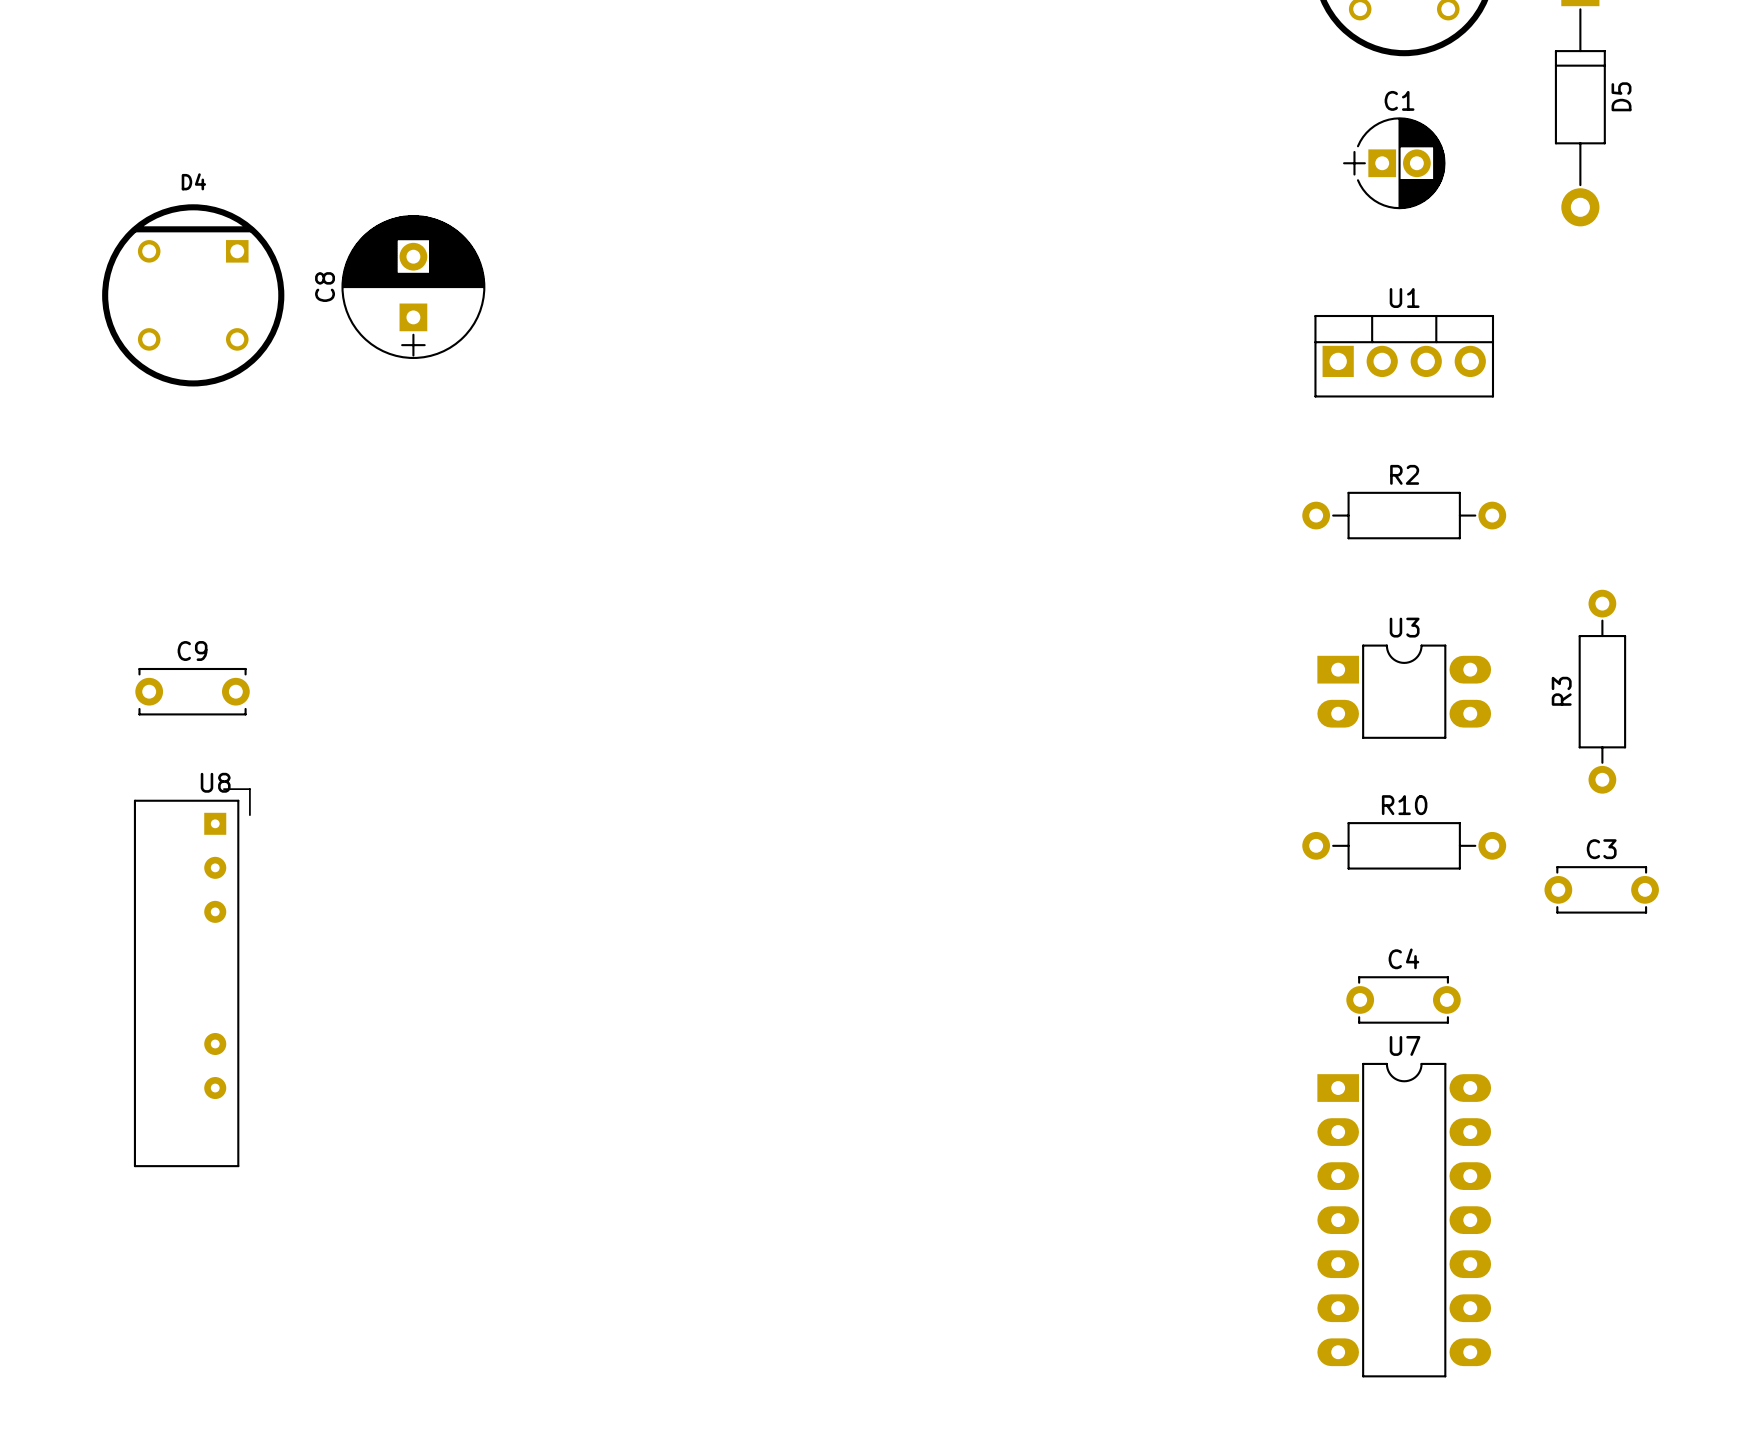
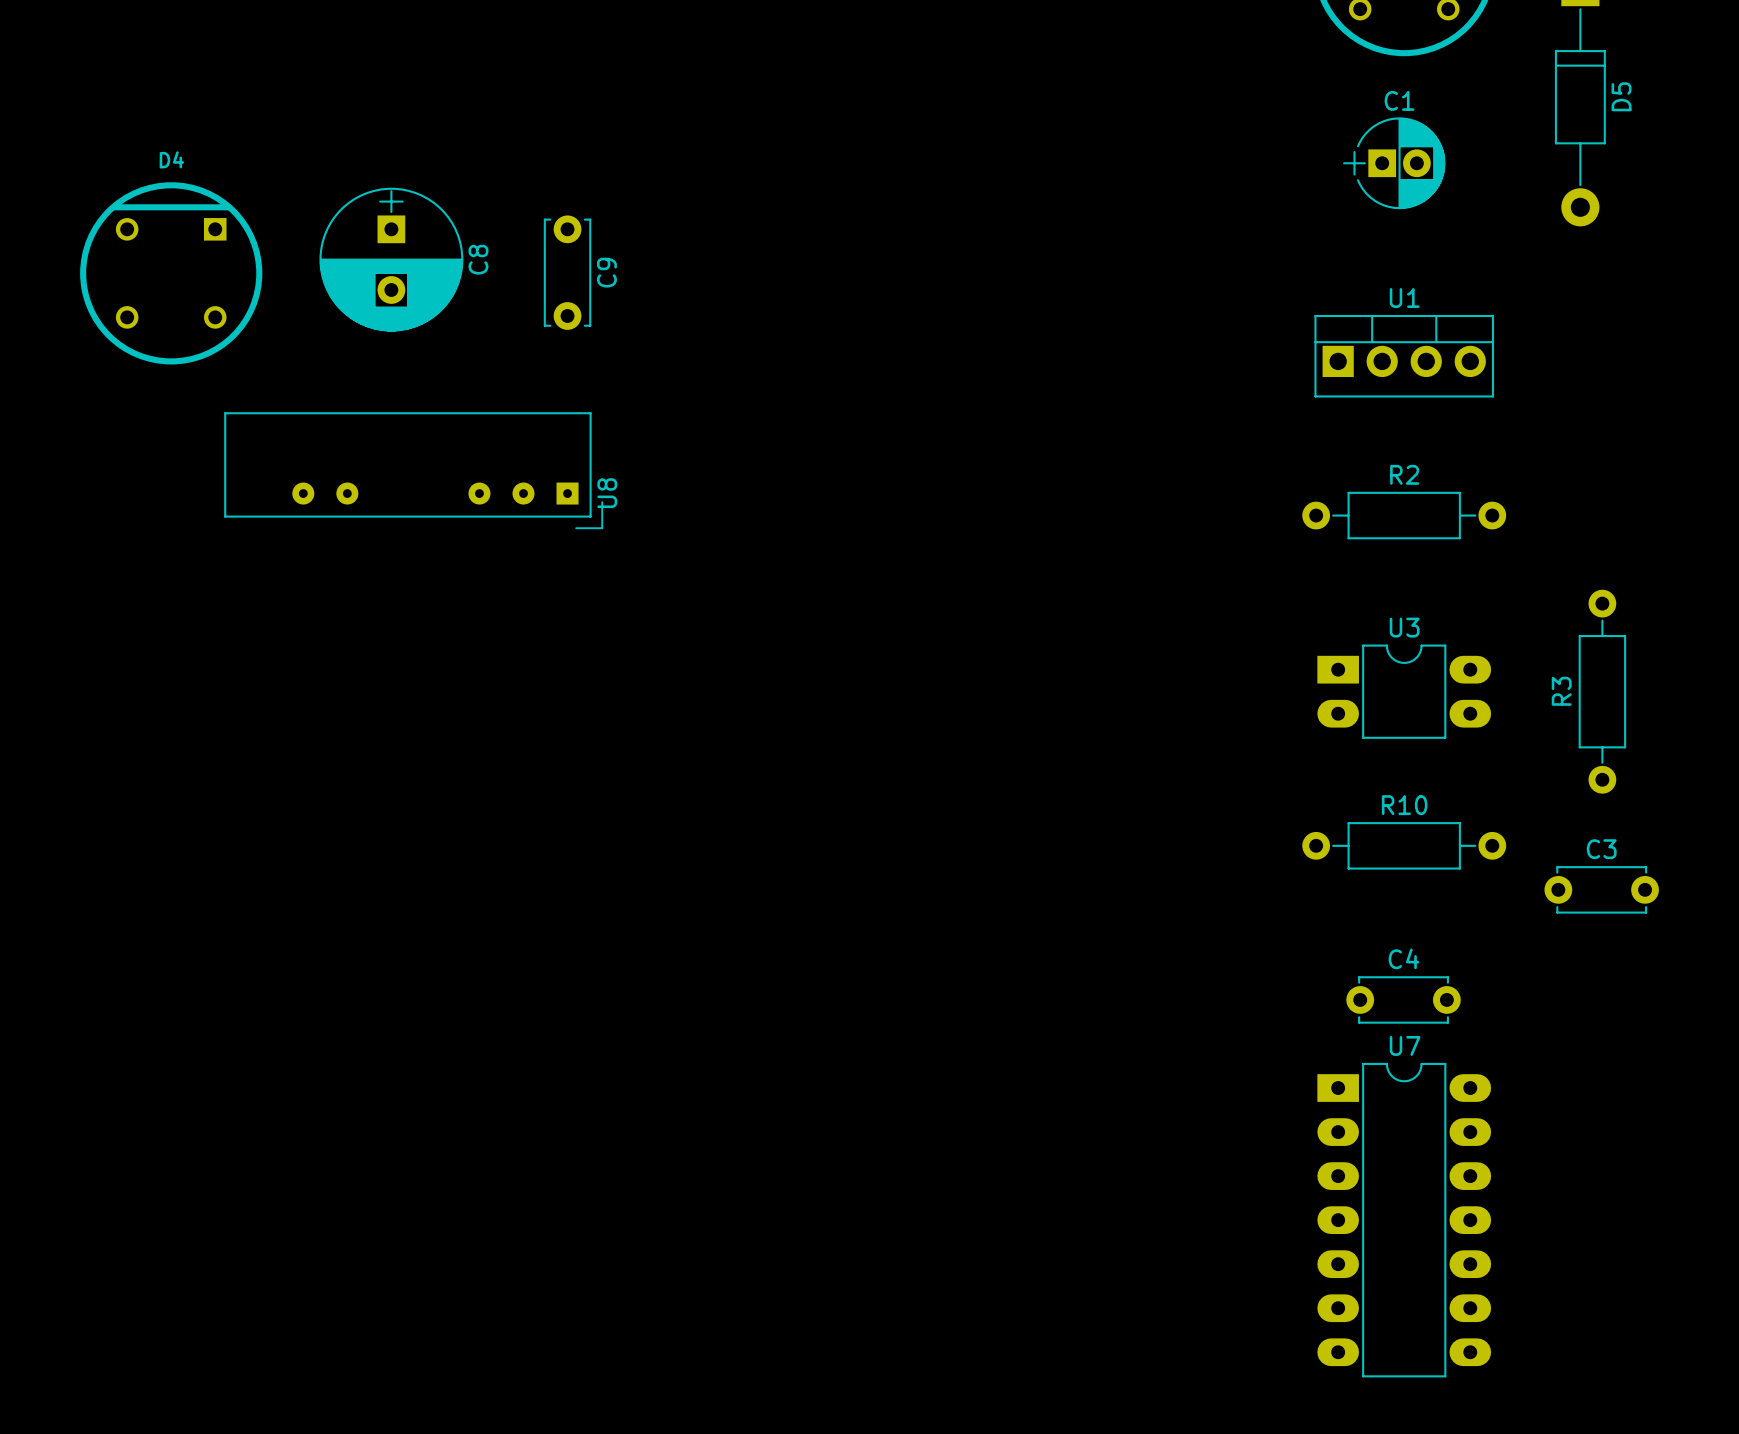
C8 rotation: 0° (413, 287) -> 180° (391, 259)
D4 position: (193, 295) -> (171, 273)
C9 rotation: 0° (192, 691) -> 90° clockwise (567, 272)
C9 position: (192, 691) -> (567, 272)
U8 rotation: 0° (192, 977) -> 90° clockwise (413, 470)
U8 position: (192, 977) -> (413, 470)

